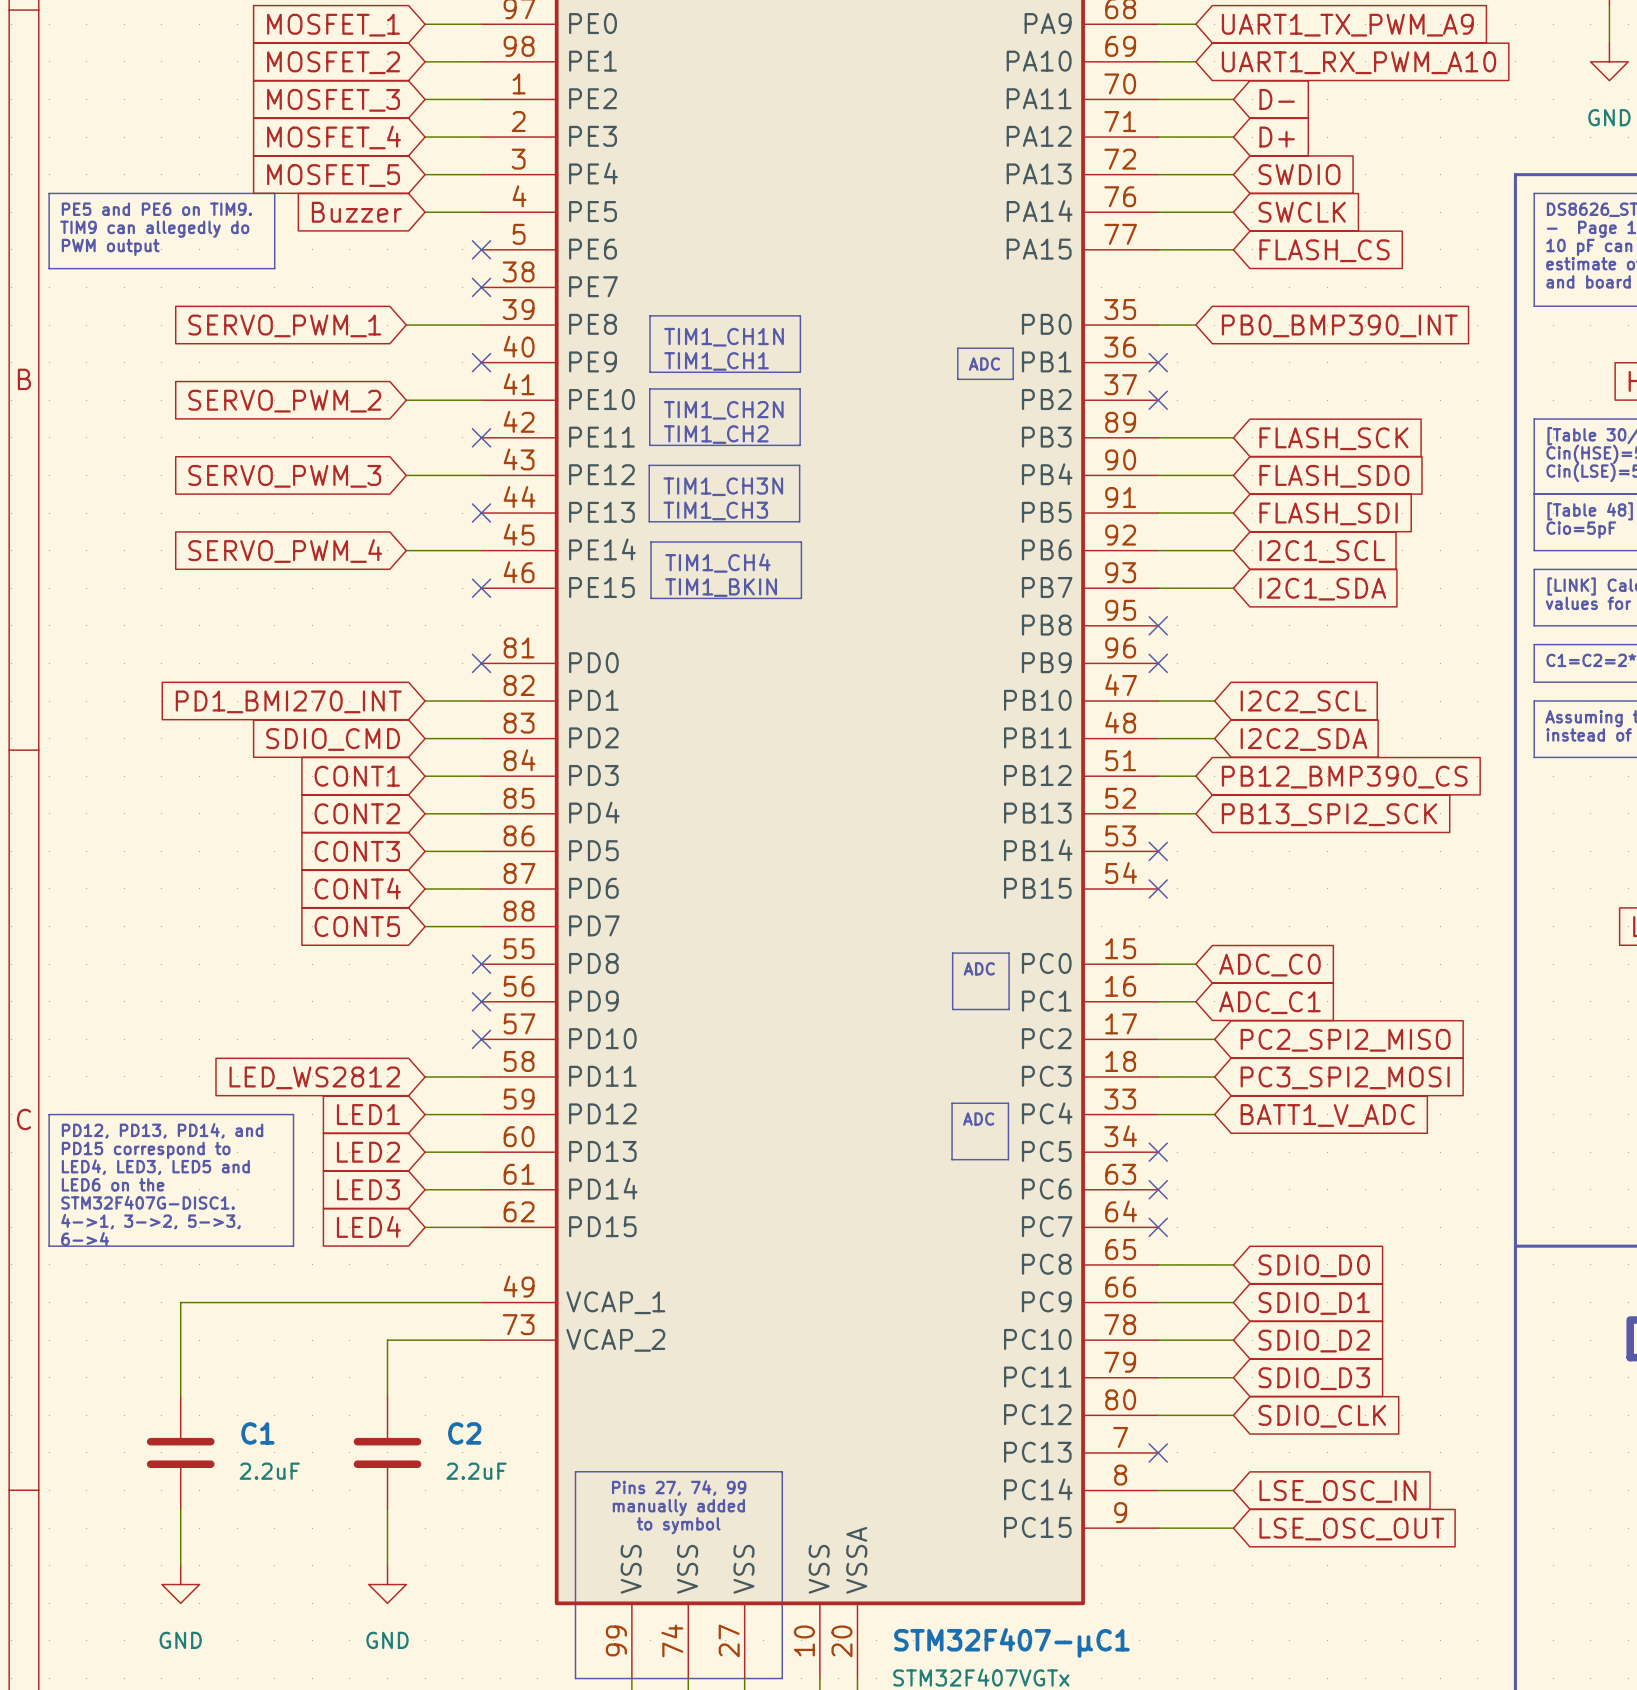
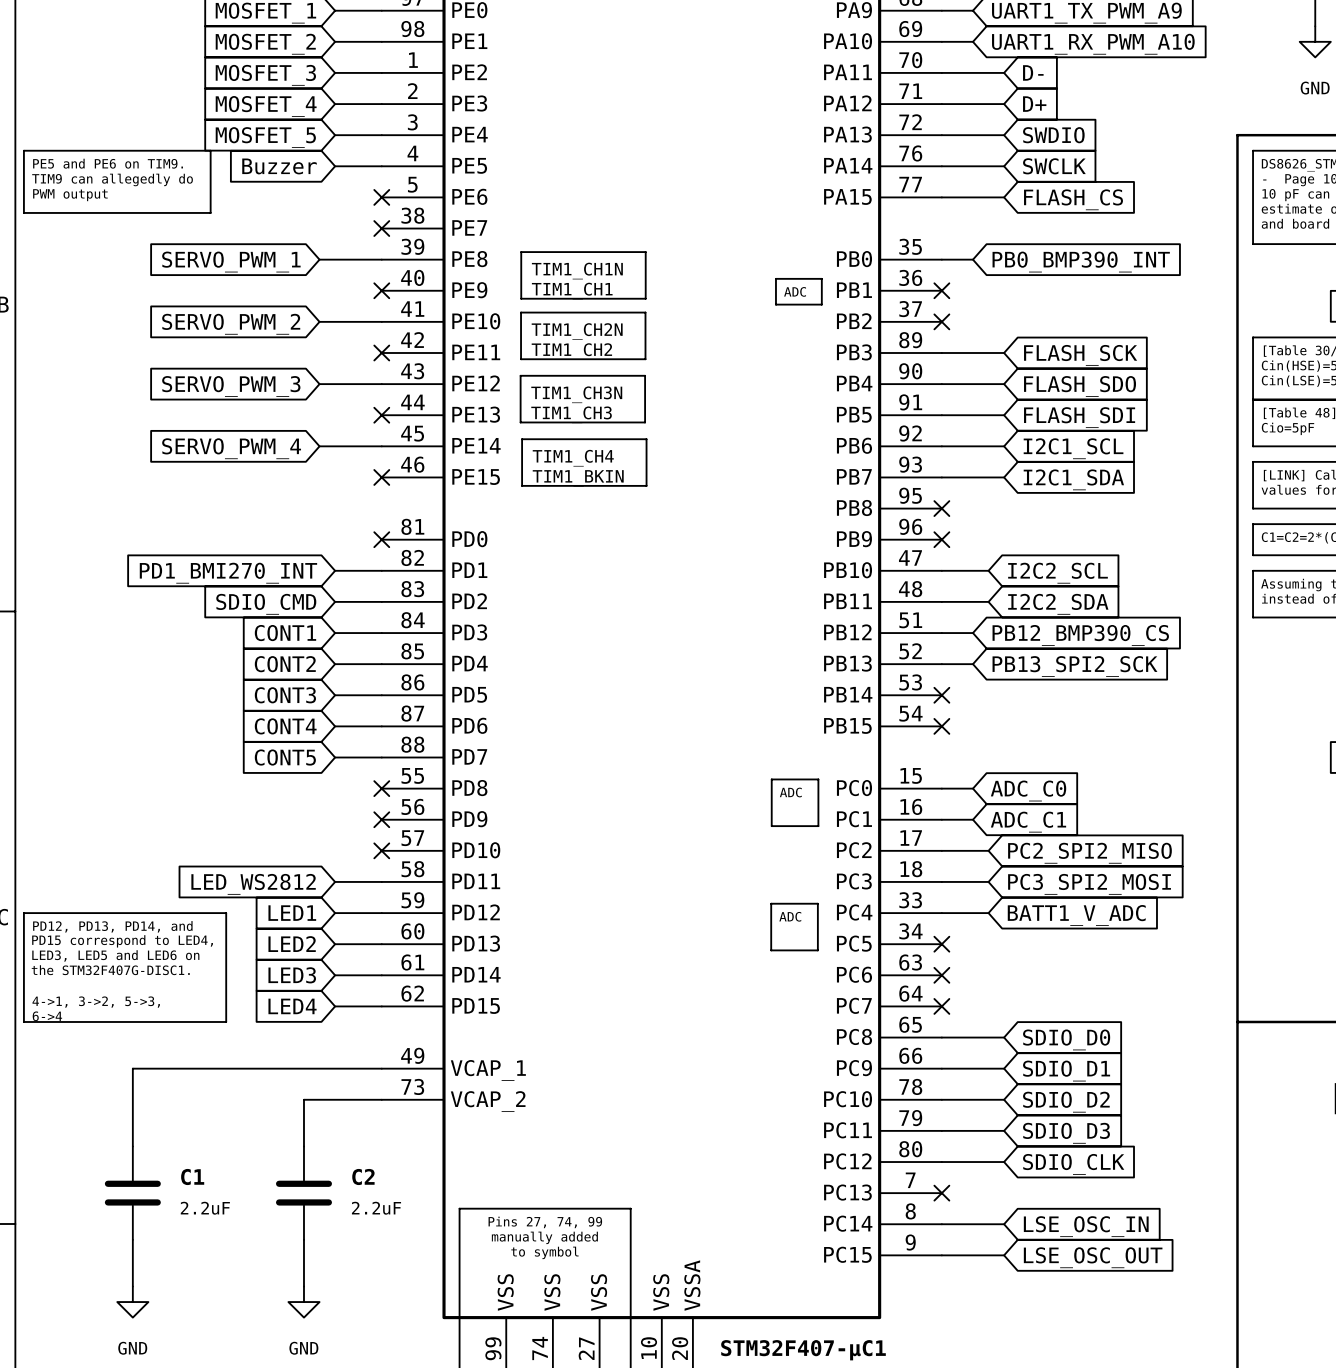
text: PD15 correspond to (146, 1150) -> PD15 correspond to LED4, (122, 941)
text: LED4, LED3, LED5 and (155, 1167) -> LED3, LED5 and LED6 on (115, 955)
text: LED6 on the (113, 1184) -> the STM32F407G-DISC1. (110, 970)
text: STM32F407G-DISC1. (148, 1202) -> none

